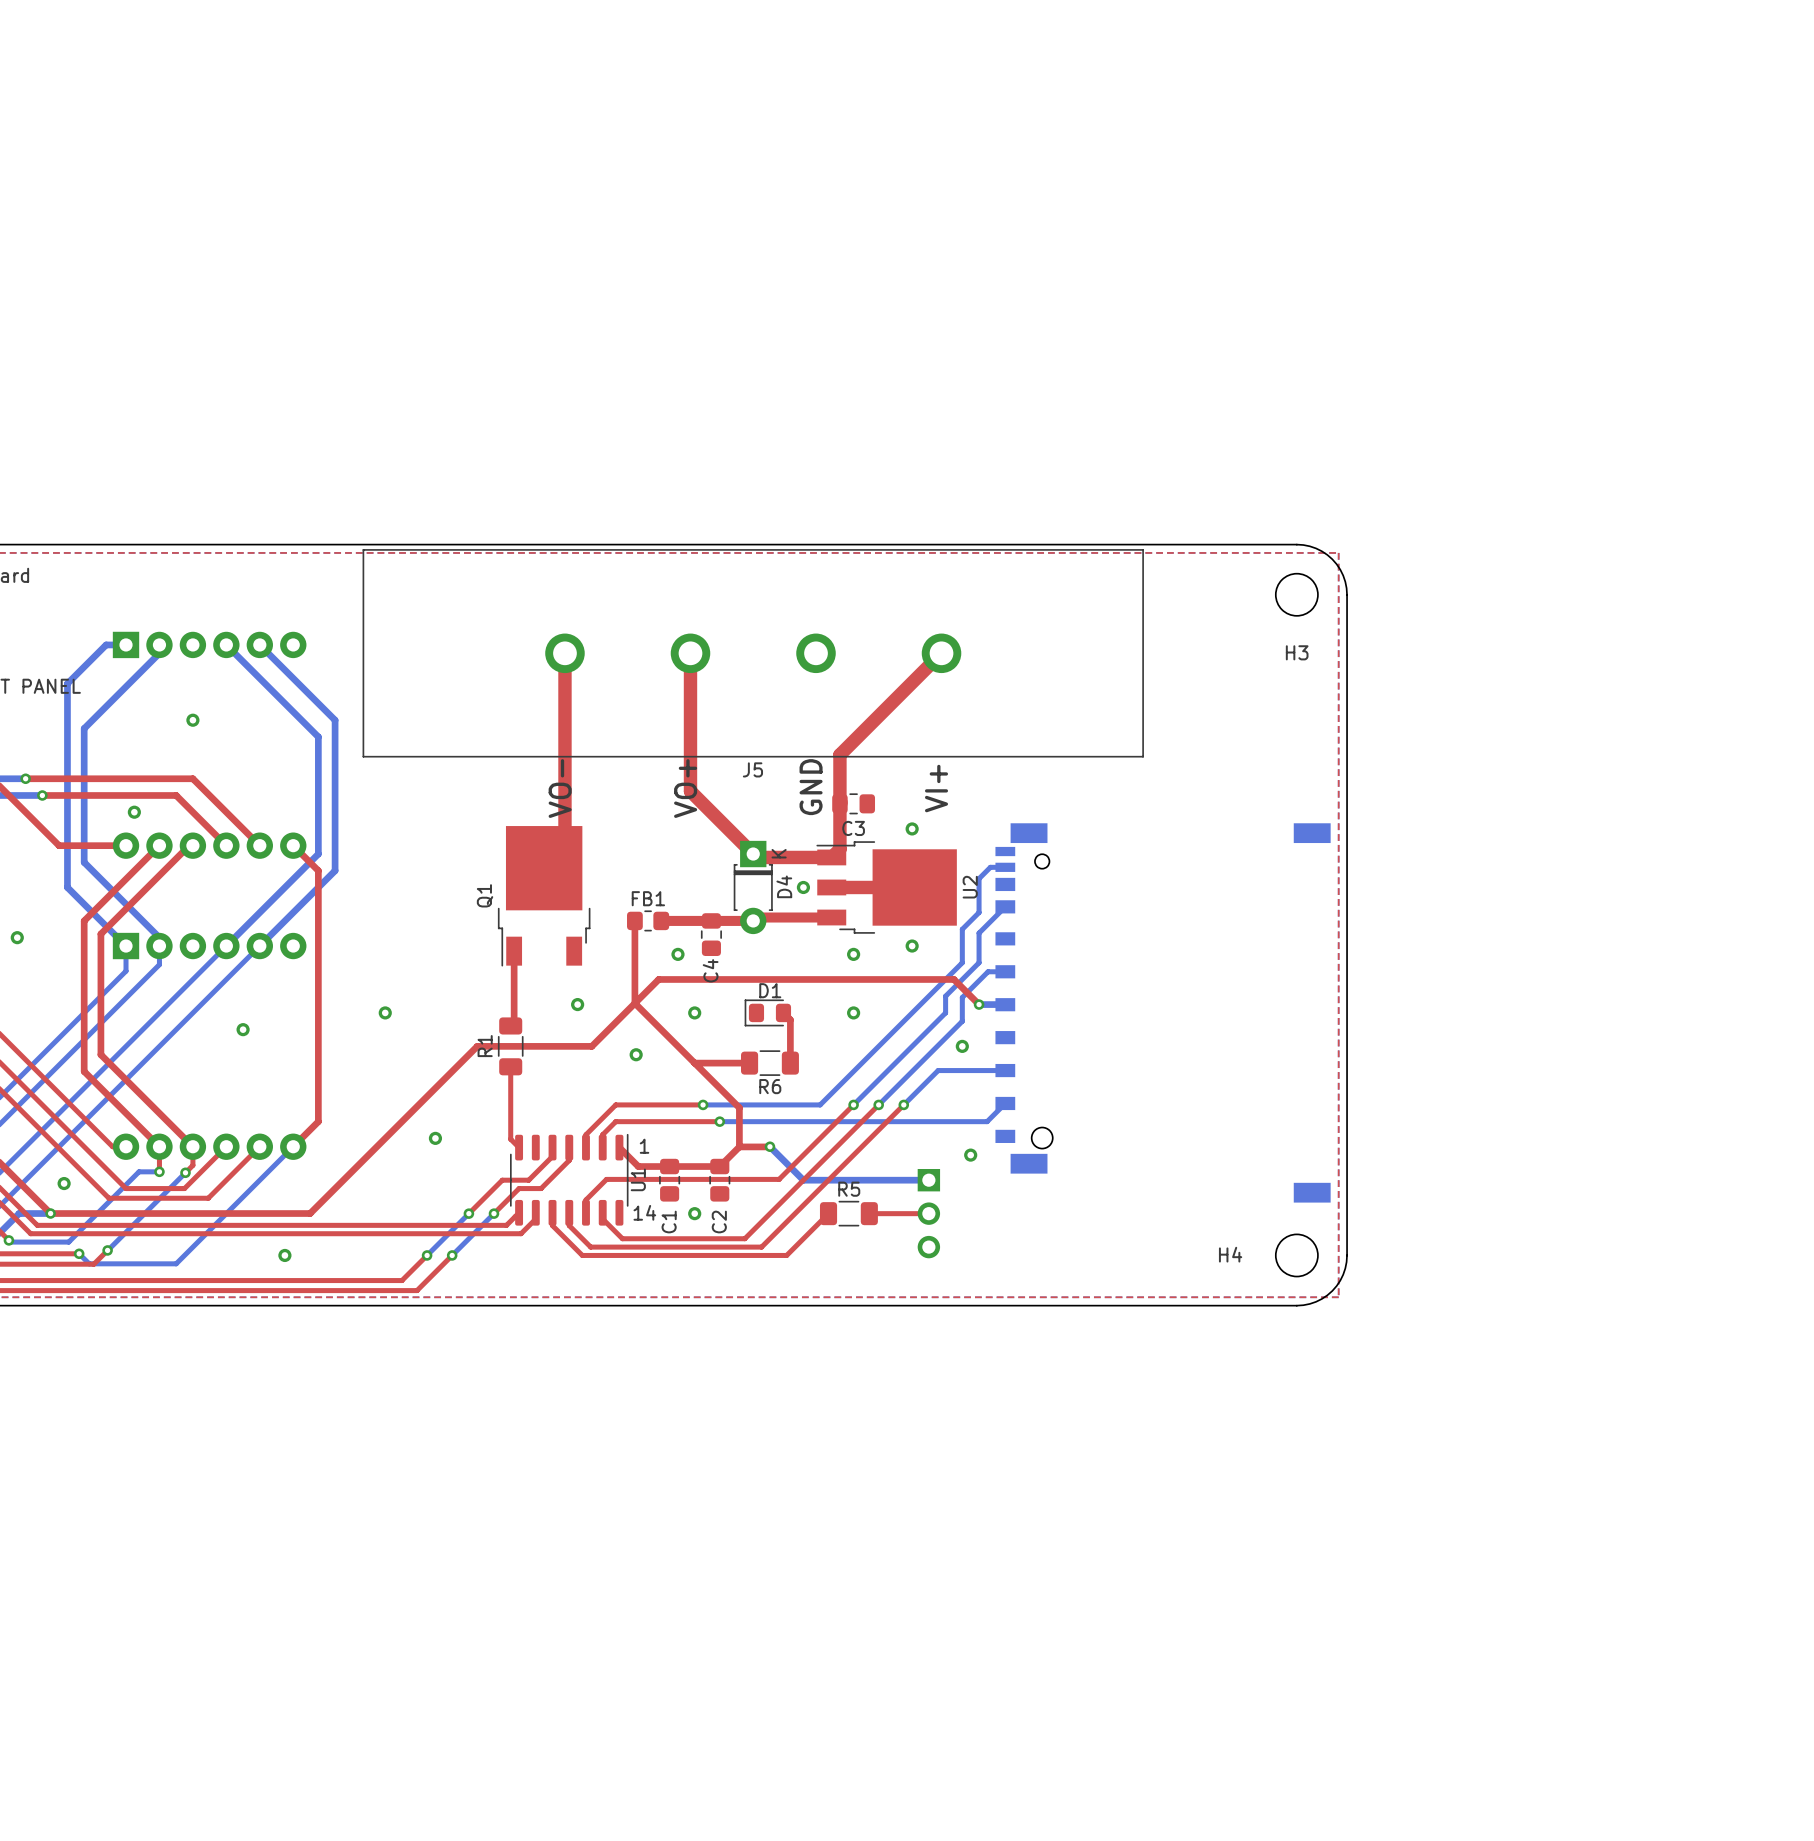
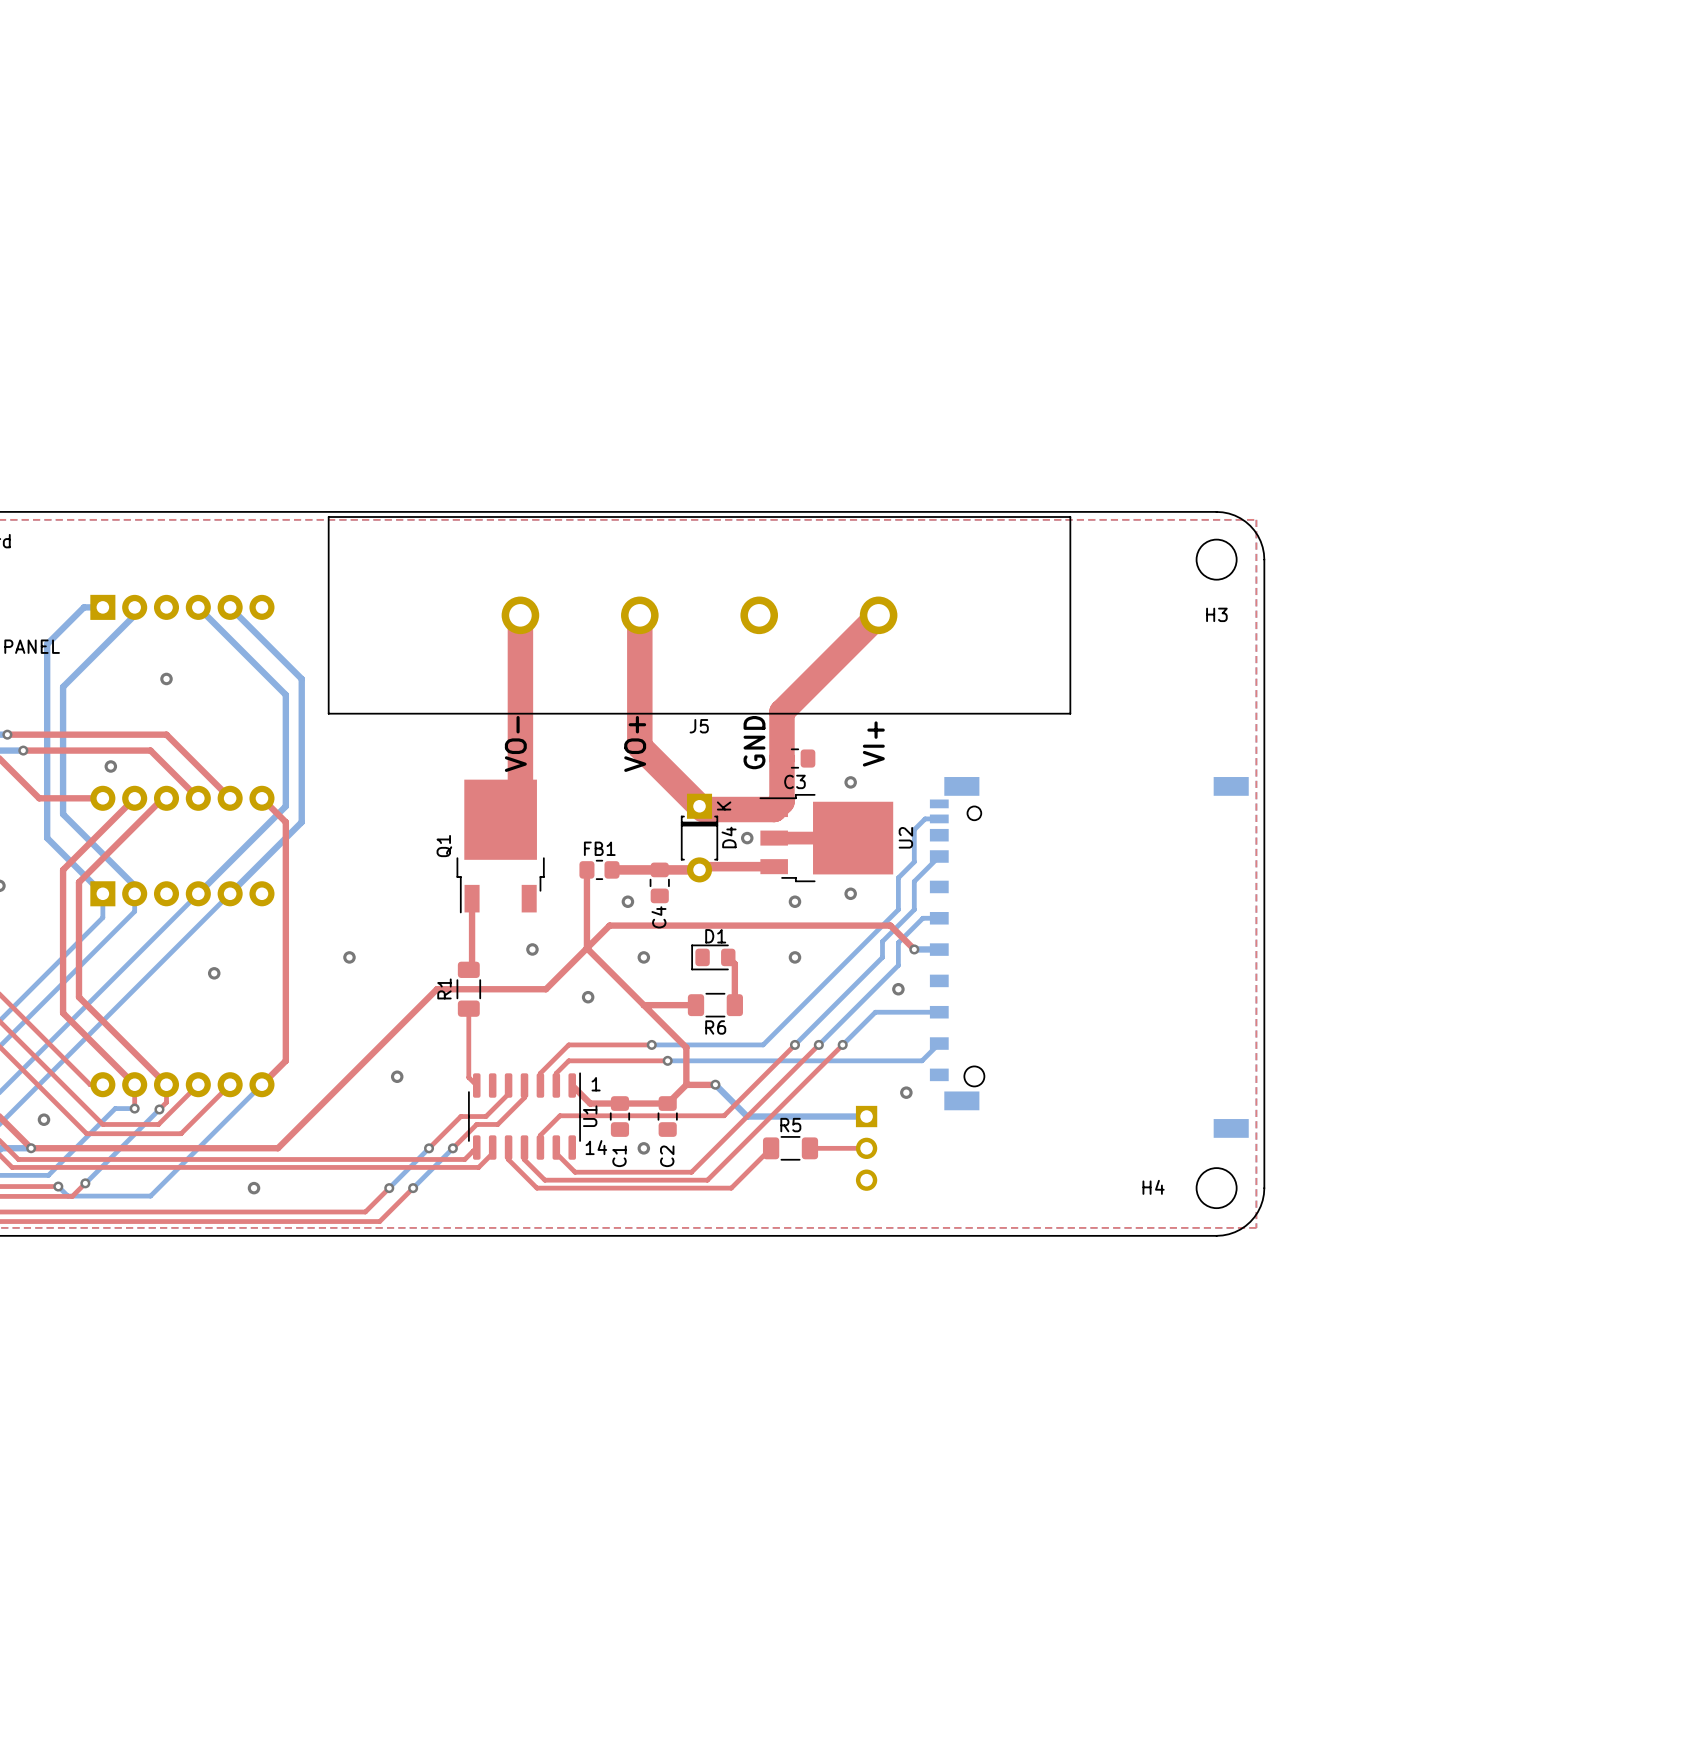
top track width: thin (564, 653) (564, 847) -> thick (520, 615) (520, 799)
top track width: thin (690, 653) (690, 791) (753, 854) -> thick (639, 615) (639, 746) (699, 806)
top track width: thin (941, 653) (839, 754) (839, 849) (831, 857) (756, 857) -> thick (878, 615) (781, 711) (781, 801) (774, 809) (702, 809)

